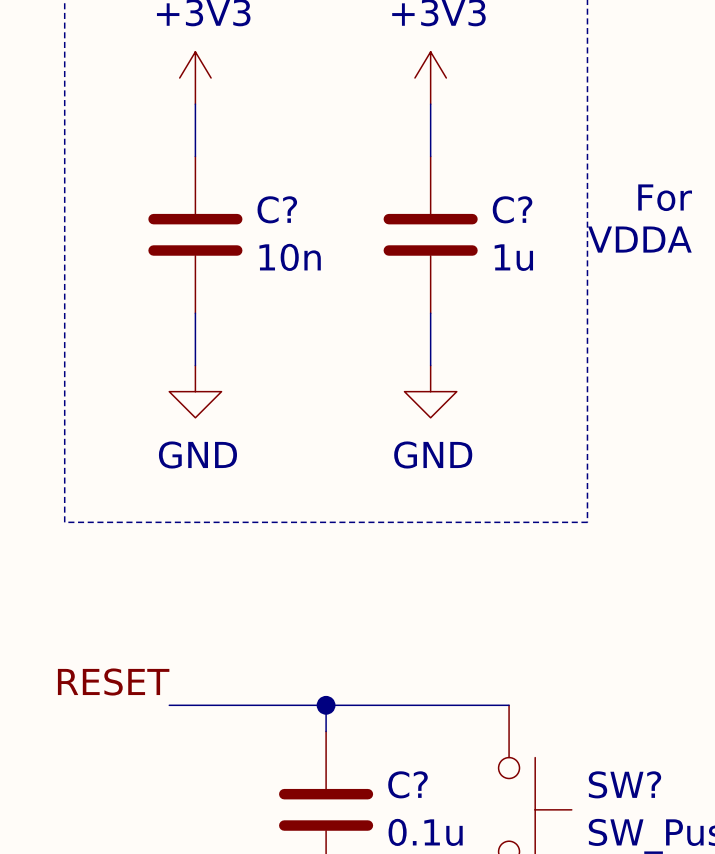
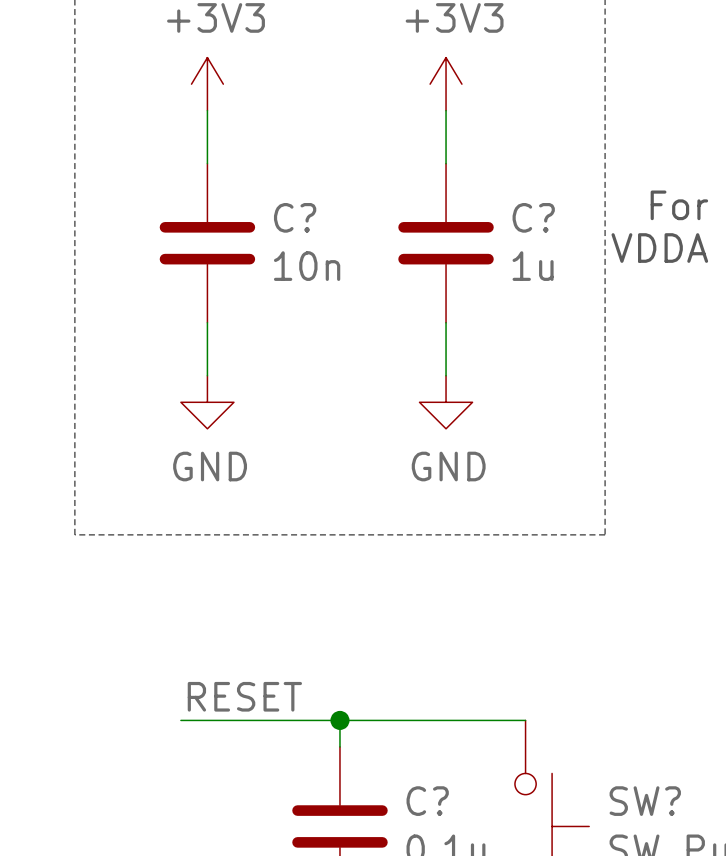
label position: RESET (113, 682) -> RESET (244, 696)

